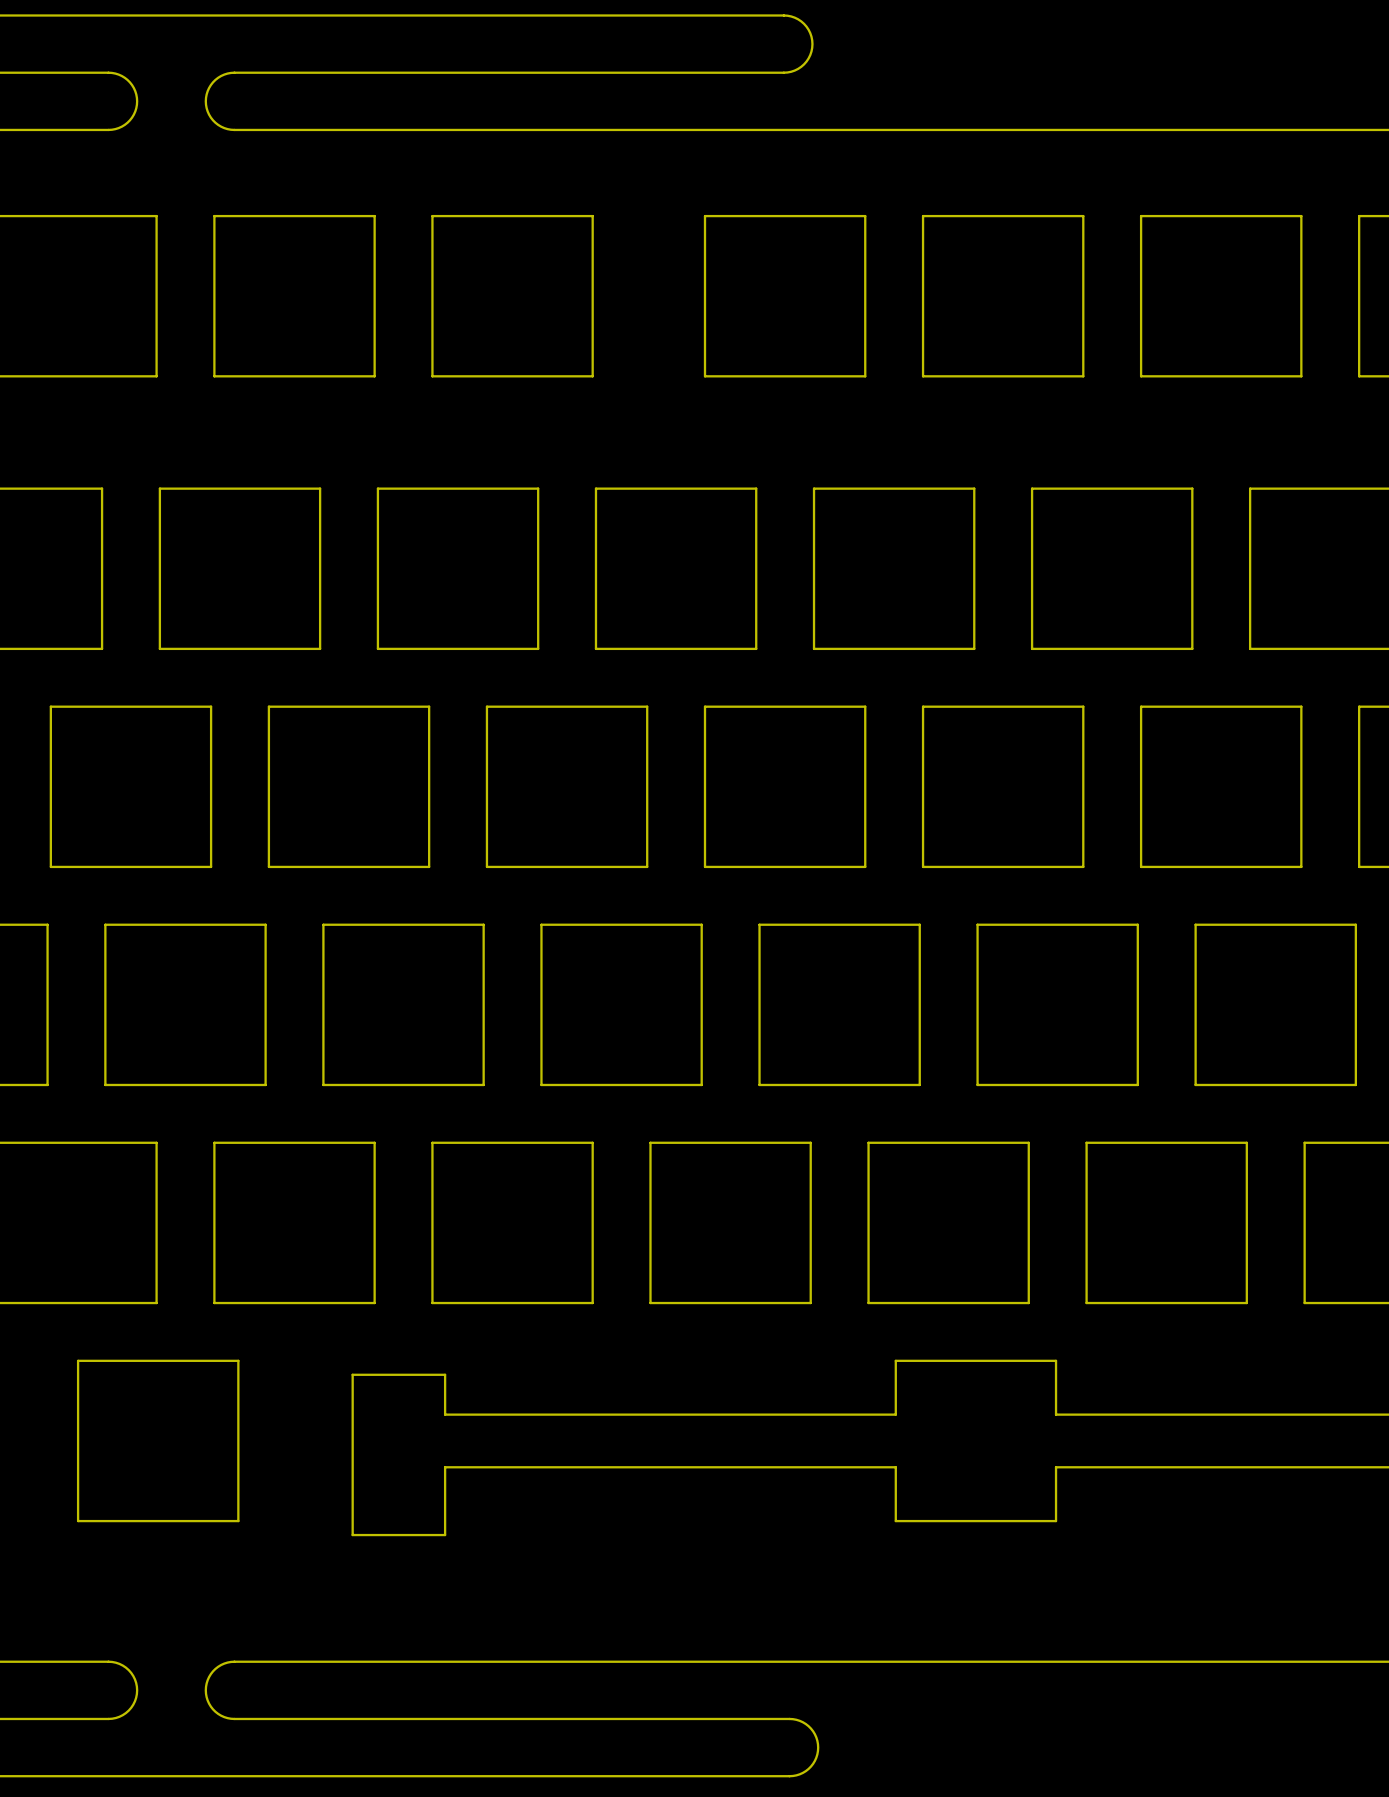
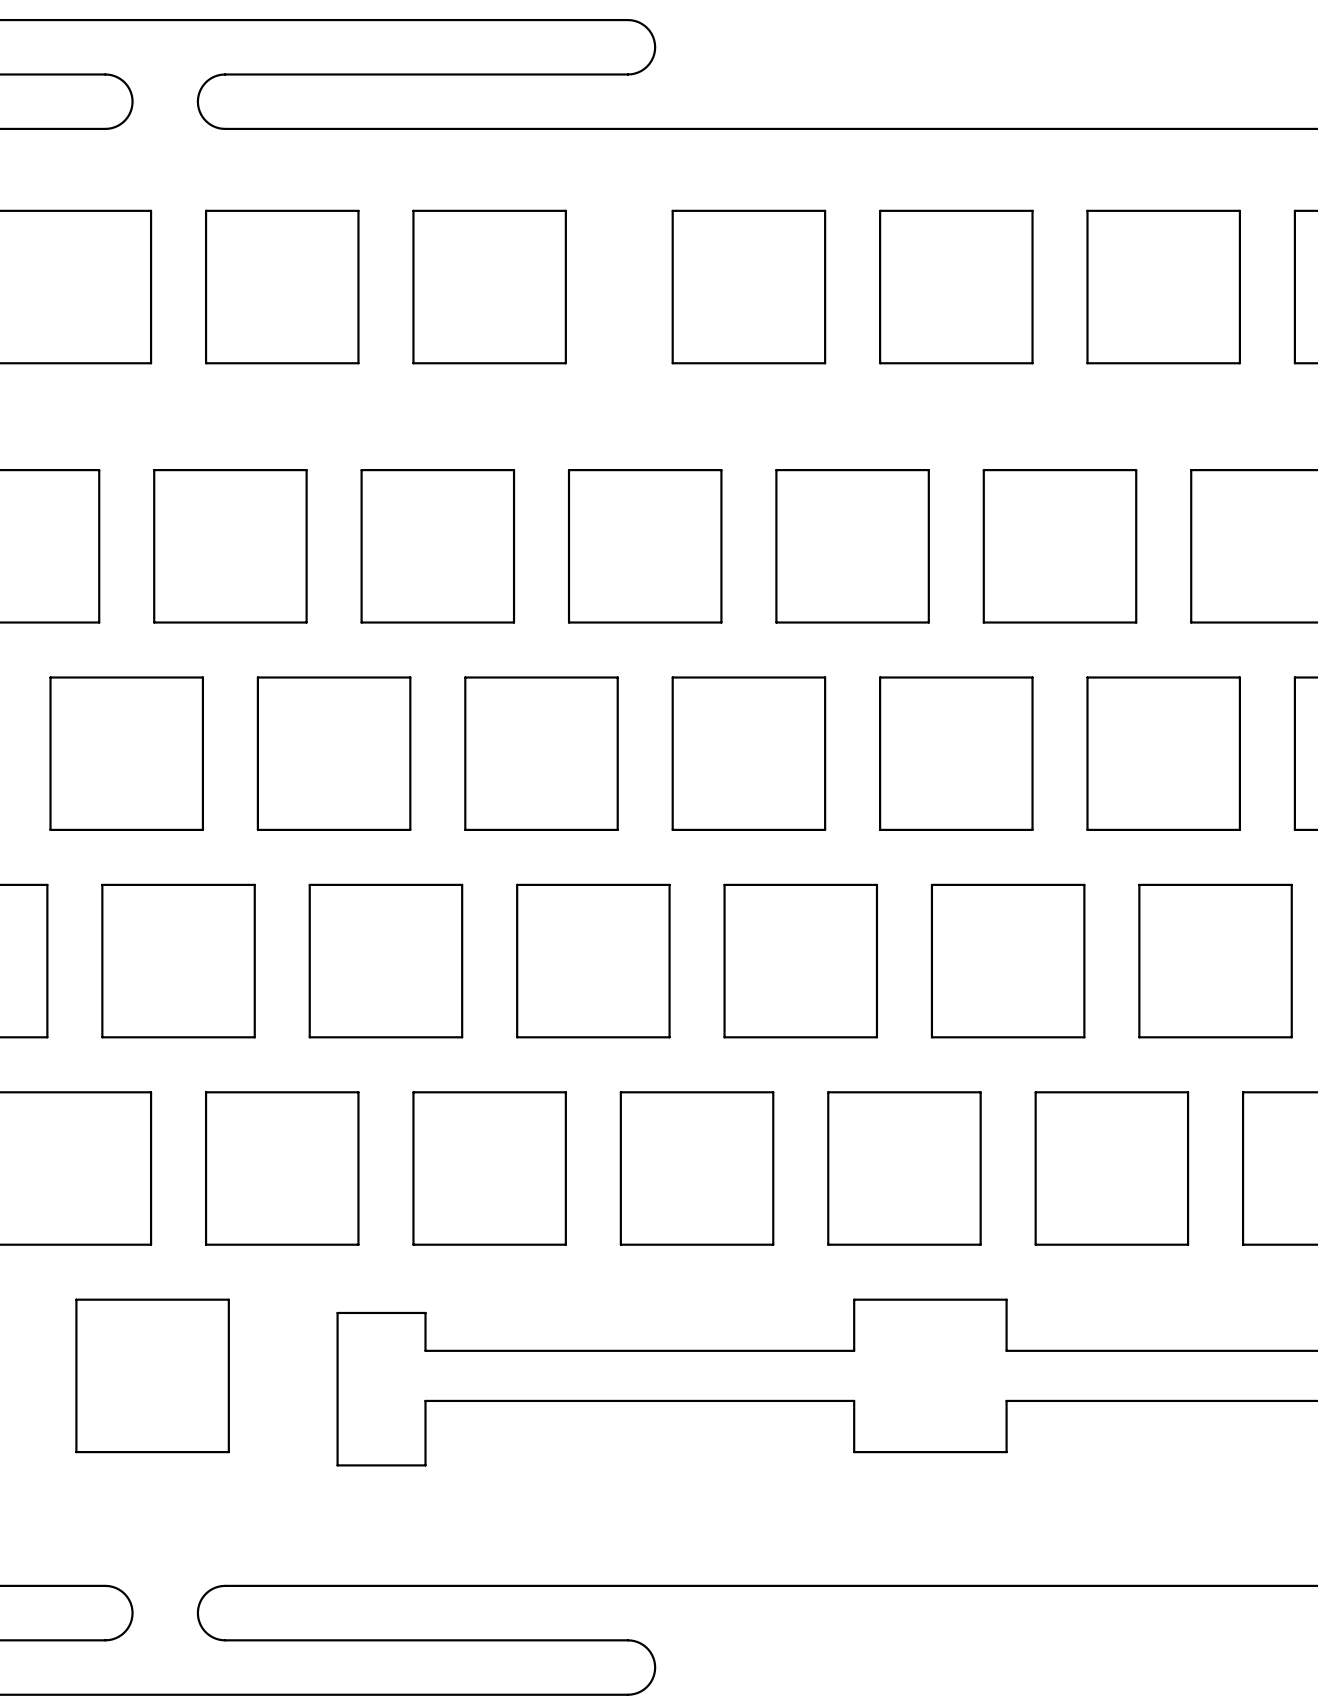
board edge: (657, 15) (787, 15) (804, 23) (810, 33) (812, 44) (810, 55) (804, 64) (787, 72) (657, 72) -> (627, 20) (638, 22) (647, 28) (653, 36) (655, 47) (653, 57) (647, 66) (638, 72) (627, 74)
board edge: (657, 1718) (793, 1719) (802, 1722) (810, 1728) (816, 1737) (818, 1747) (816, 1757) (810, 1766) (802, 1772) (793, 1775) (657, 1776) -> (627, 1640) (637, 1642) (648, 1649) (653, 1657) (655, 1667) (653, 1677) (648, 1685) (640, 1691) (627, 1694)

